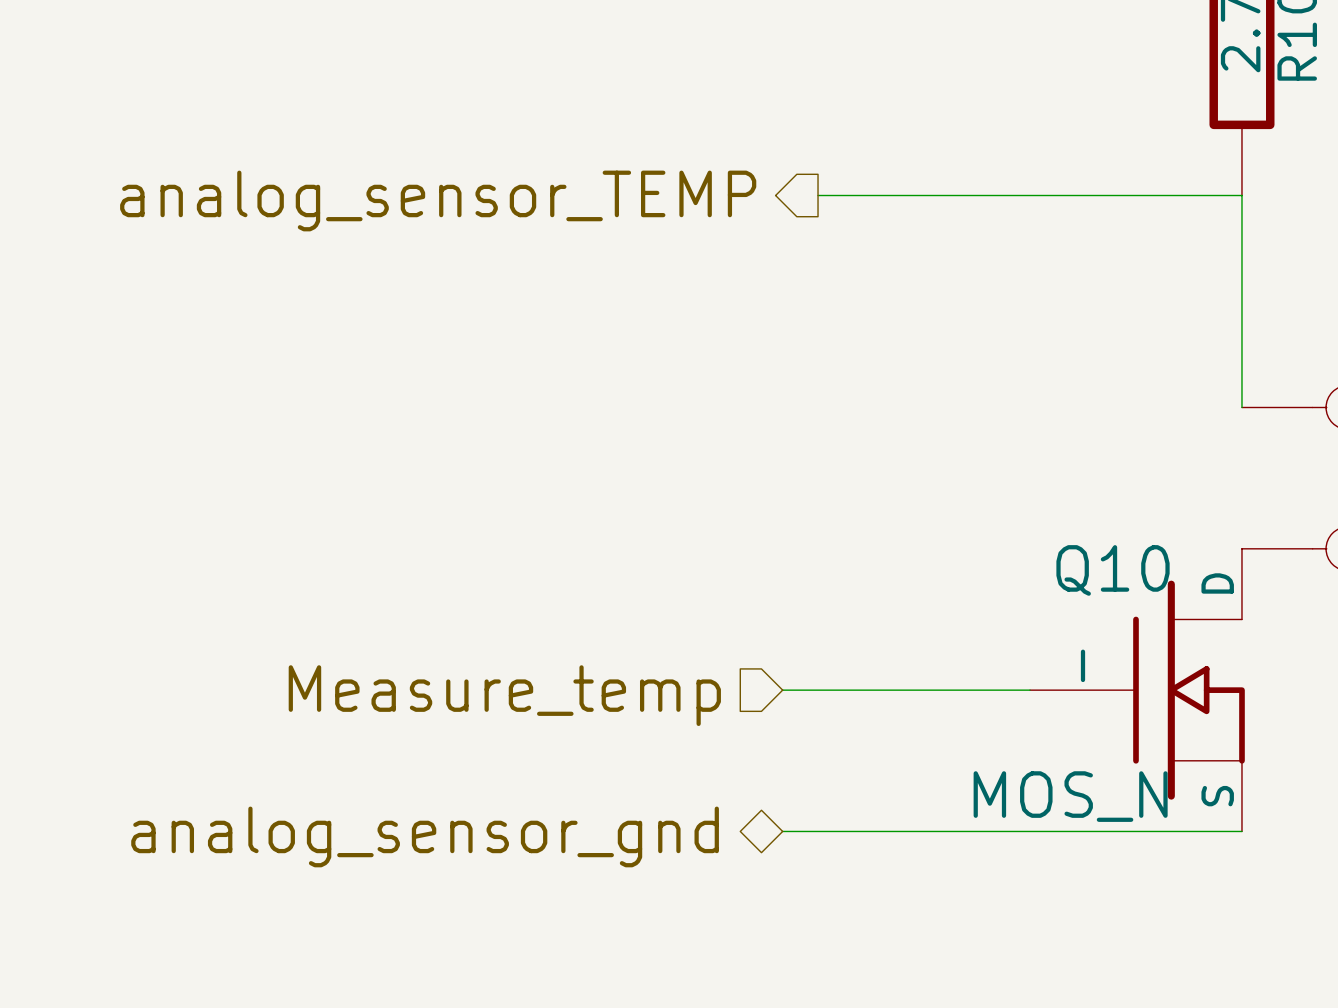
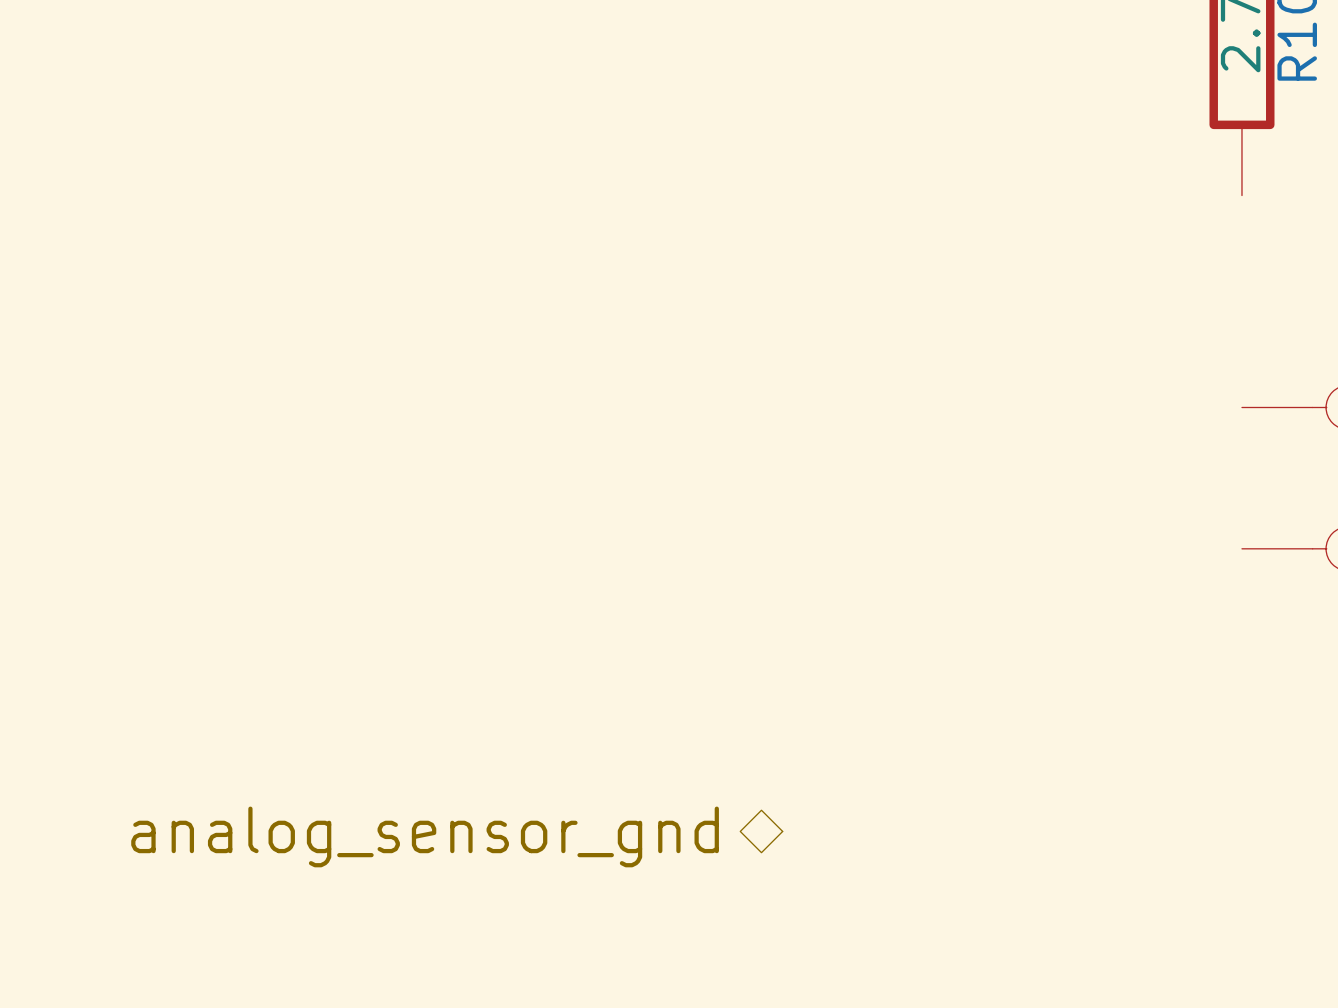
wire: (818, 195) (1241, 195) (1241, 407) -> none
hierarchical label: analog_sensor_TEMP (438, 200) -> none
wire: (782, 690) (1030, 690) -> none
Q10: MOS_N (1137, 690) -> none
hierarchical label: Measure_temp (504, 695) -> none
wire: (782, 831) (1241, 831) -> none

